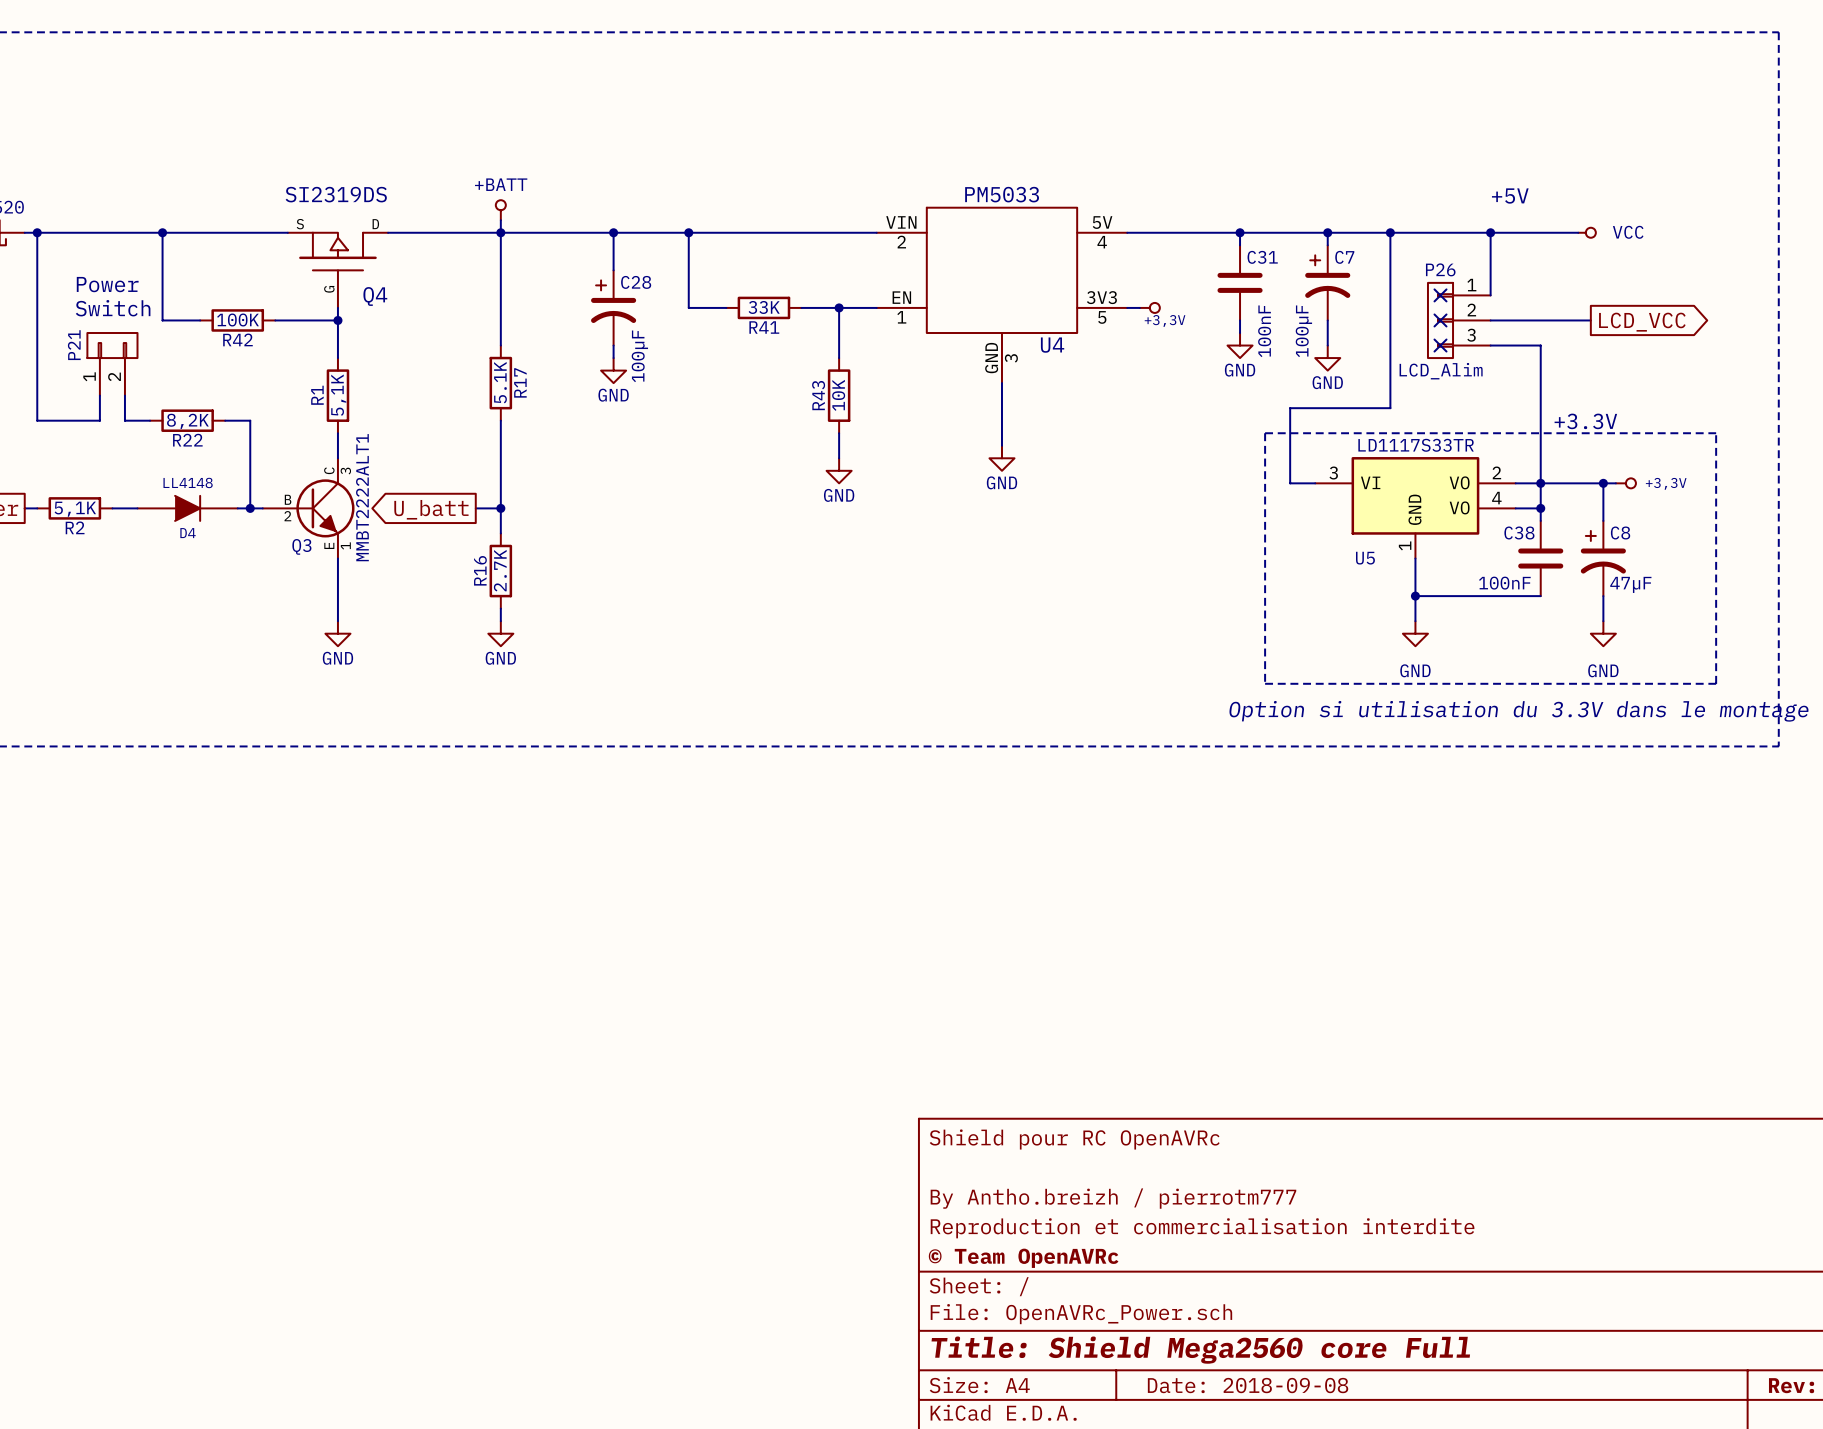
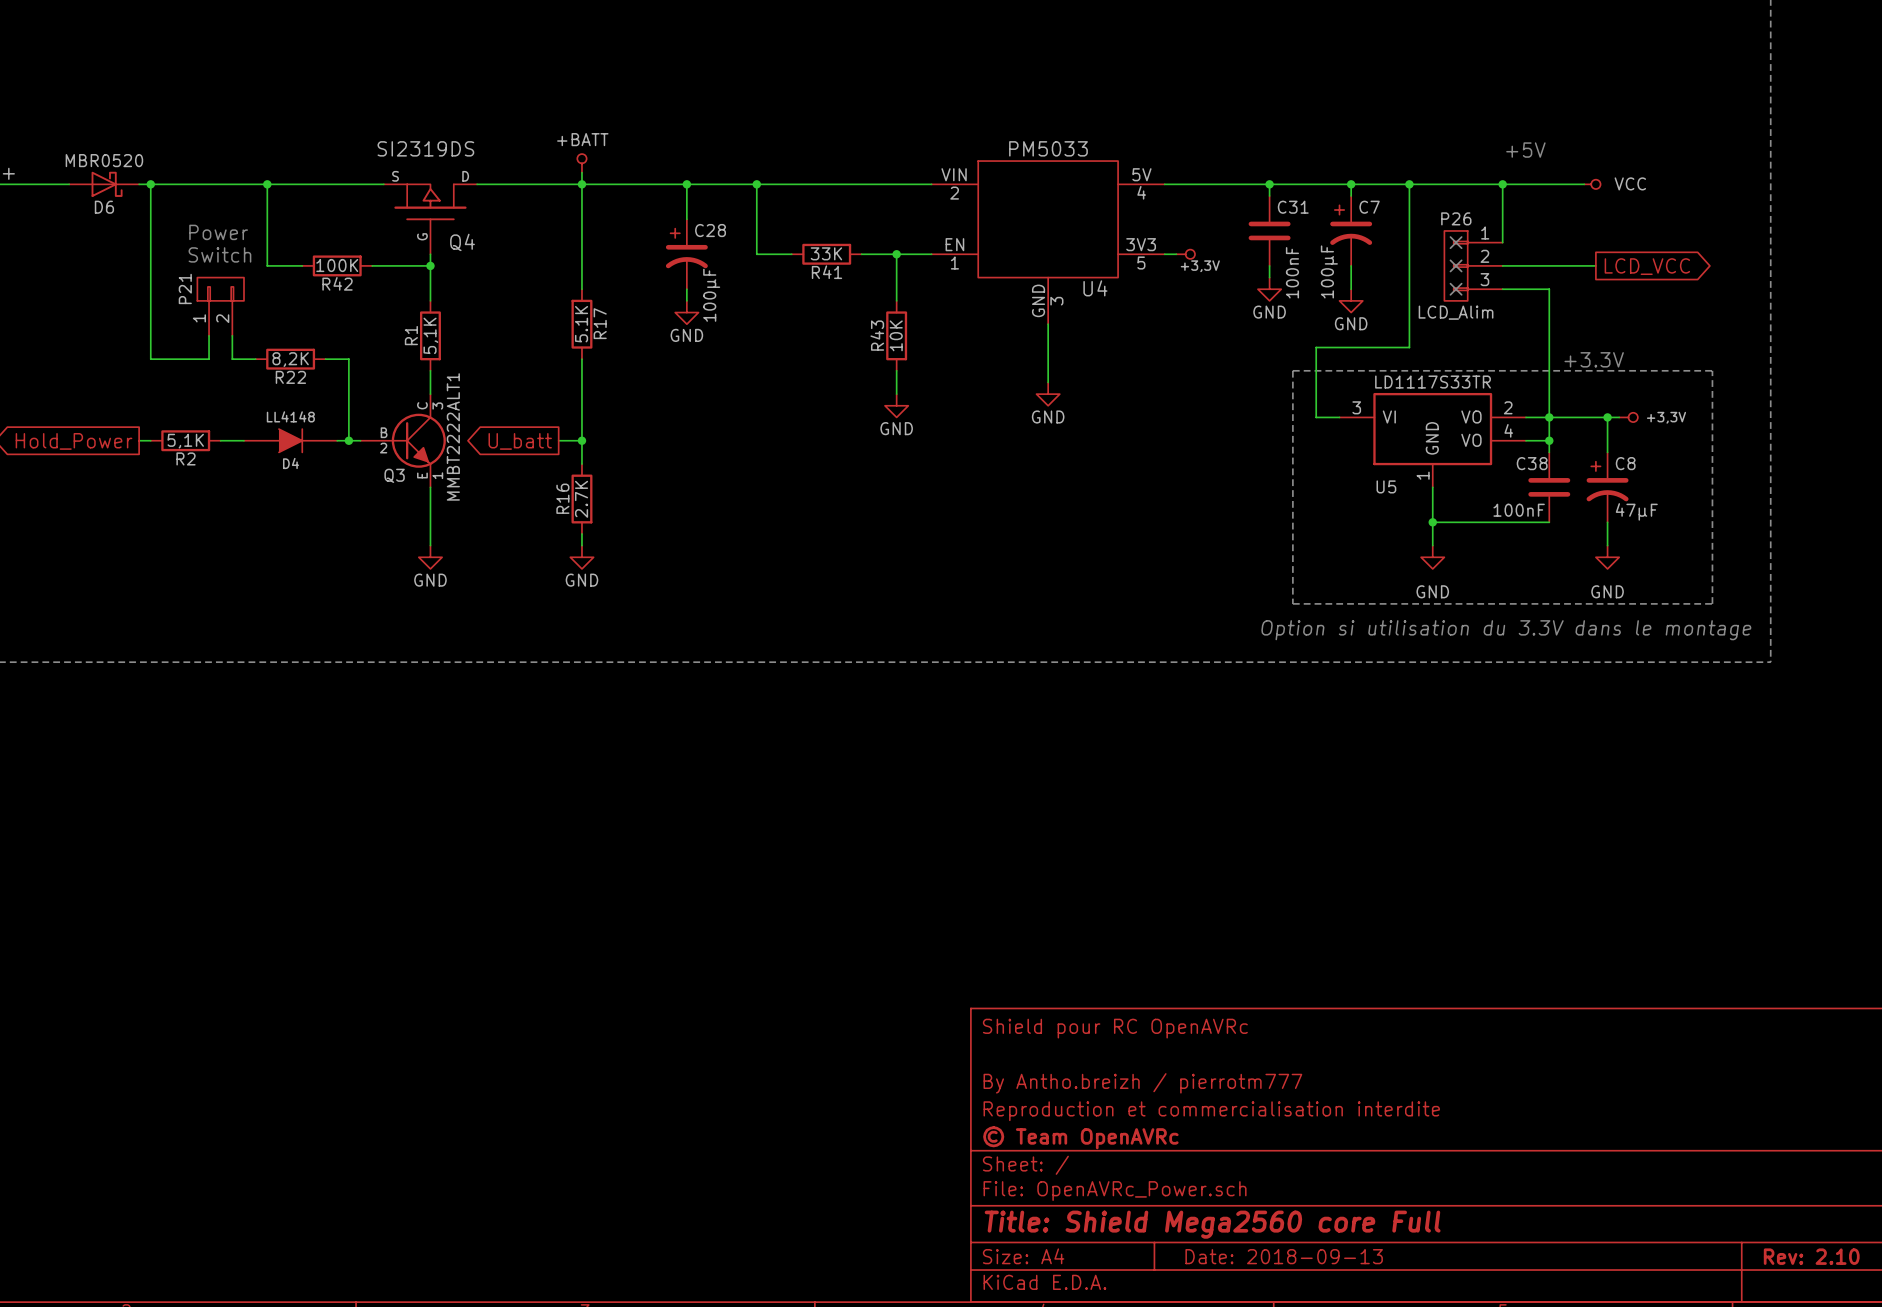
title block: Date: 2018-09-08 (1248, 1385) -> Date: 2018-09-13 (1284, 1256)

